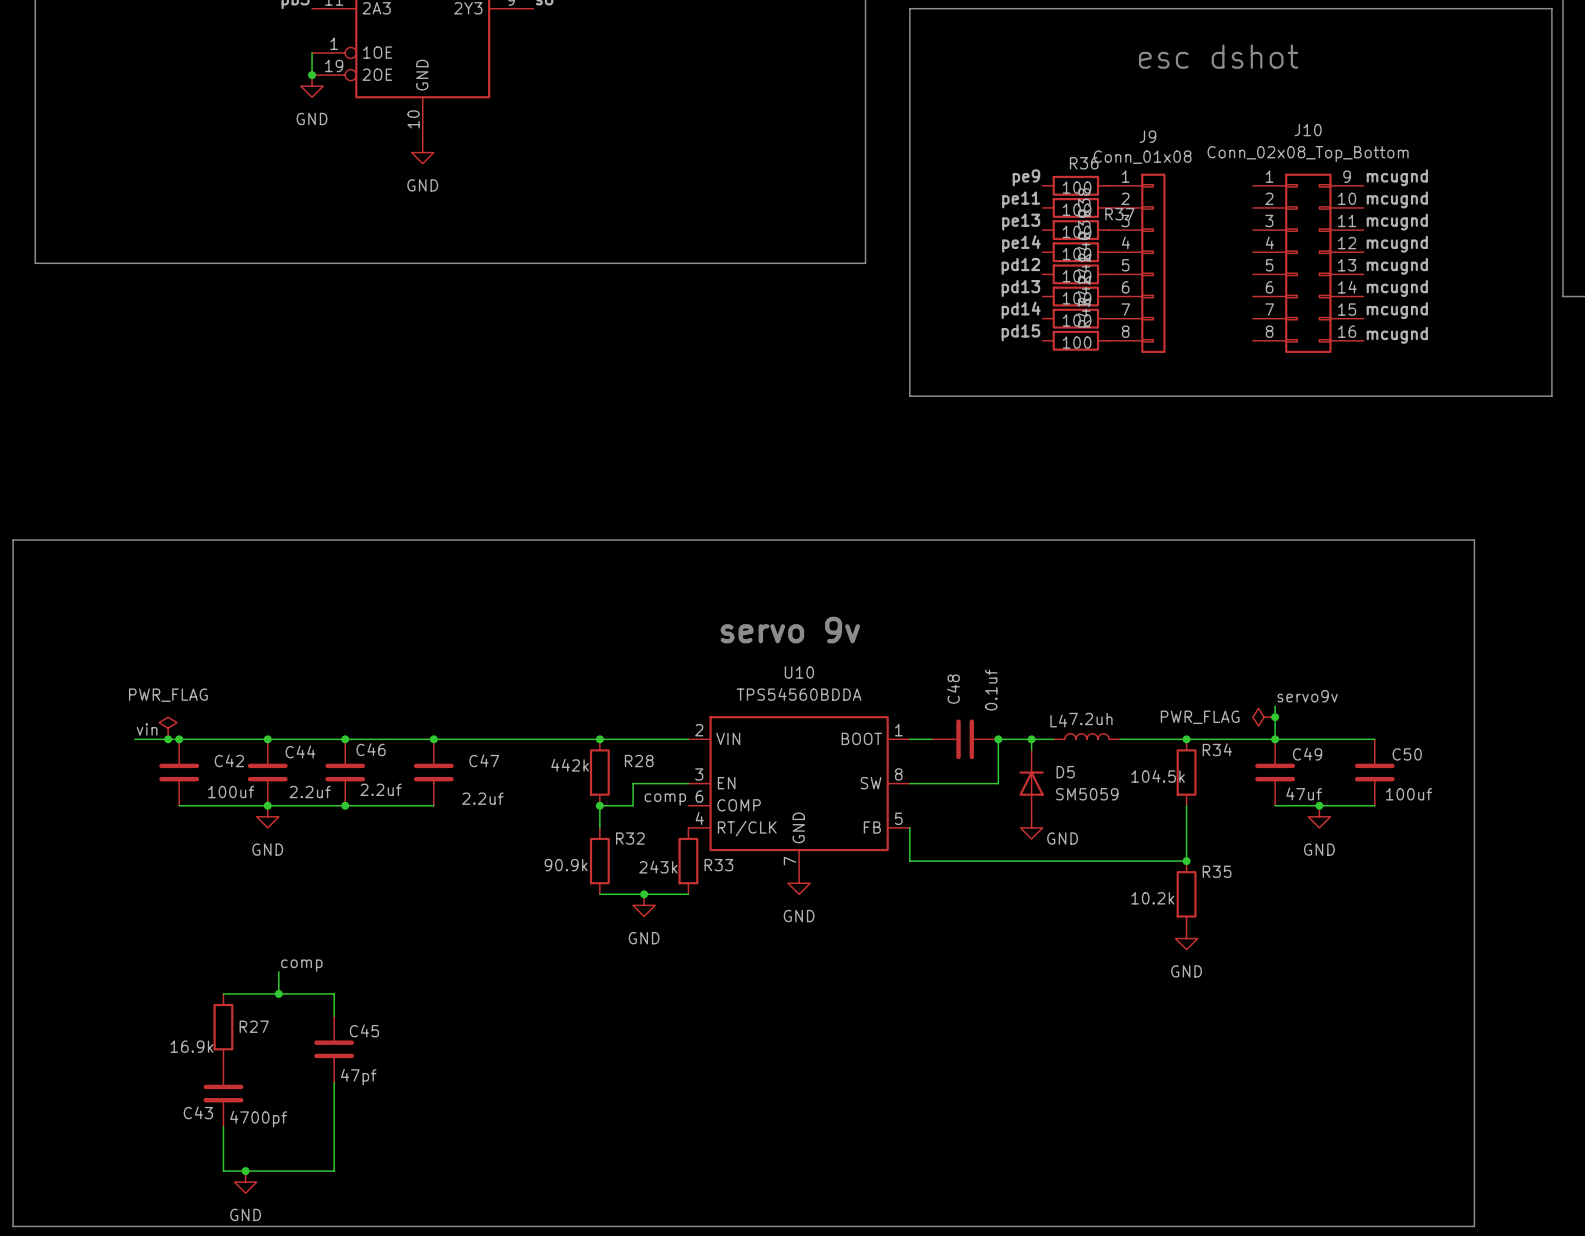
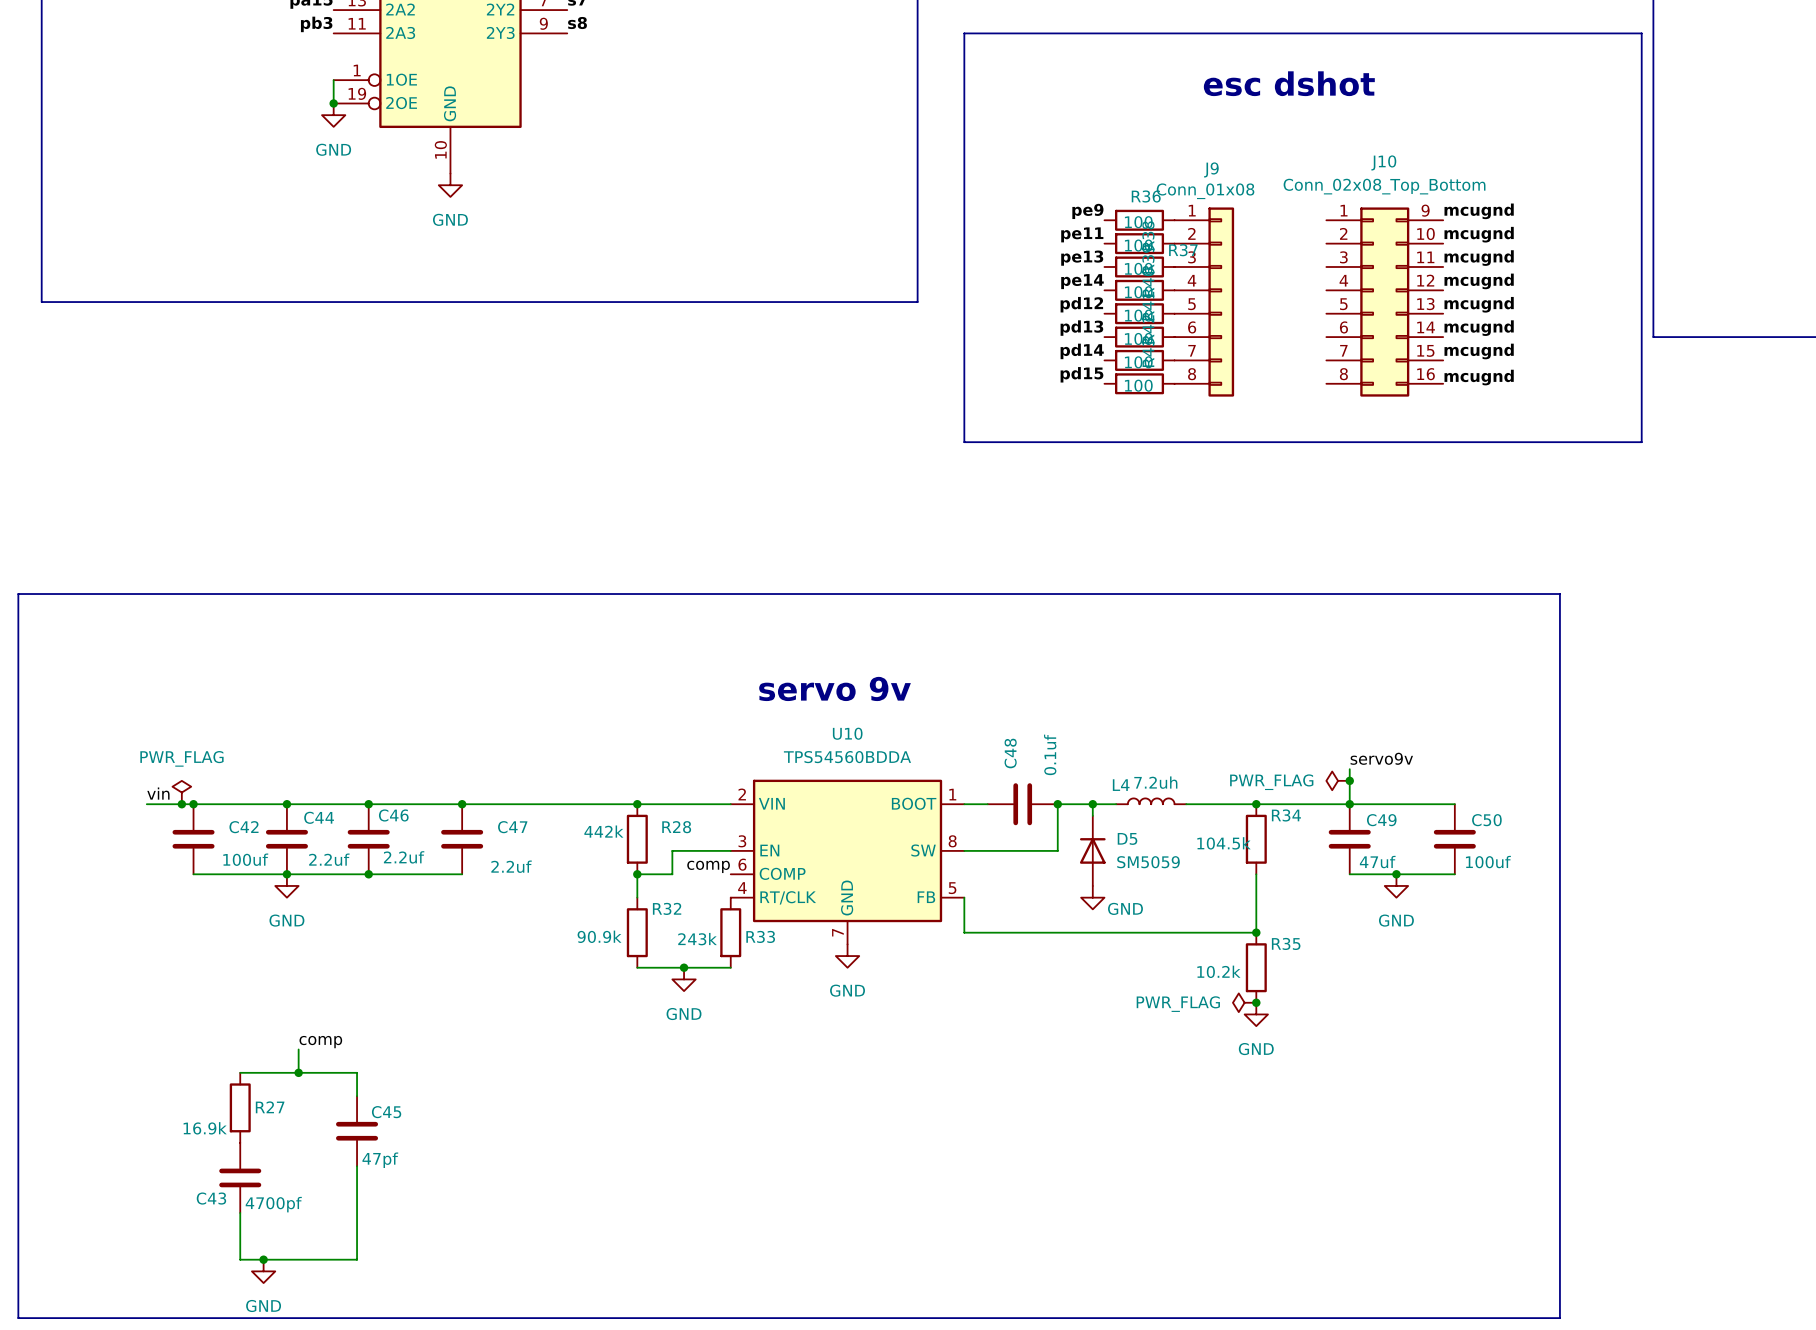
power symbol: none -> PWR_FLAG (1244, 1002)
junction: none -> (1256, 1002)

